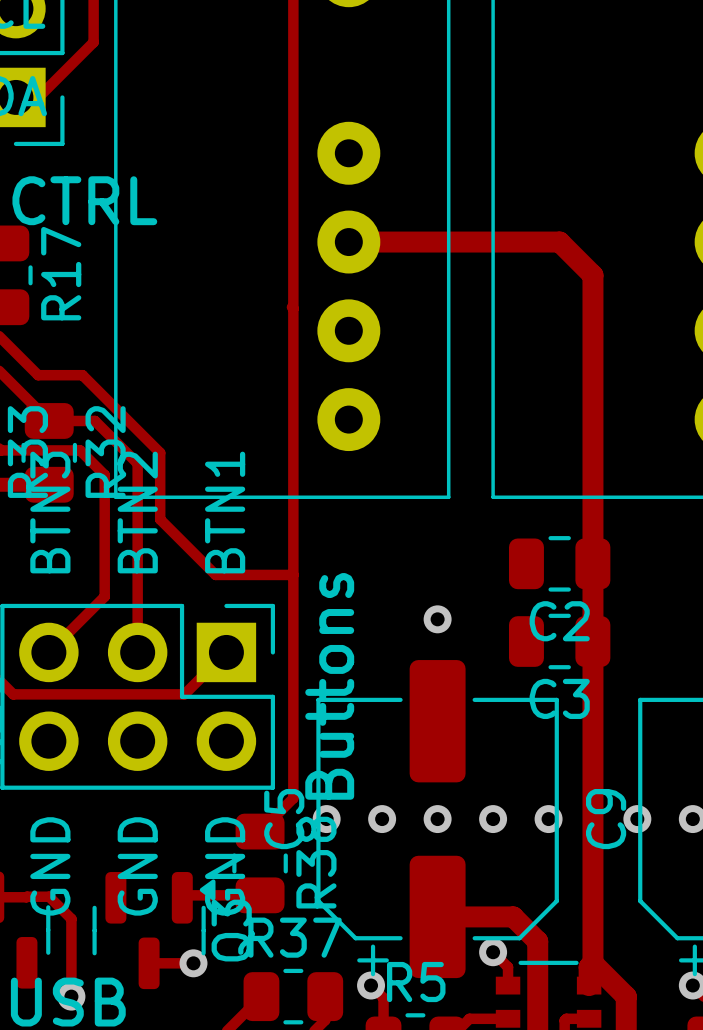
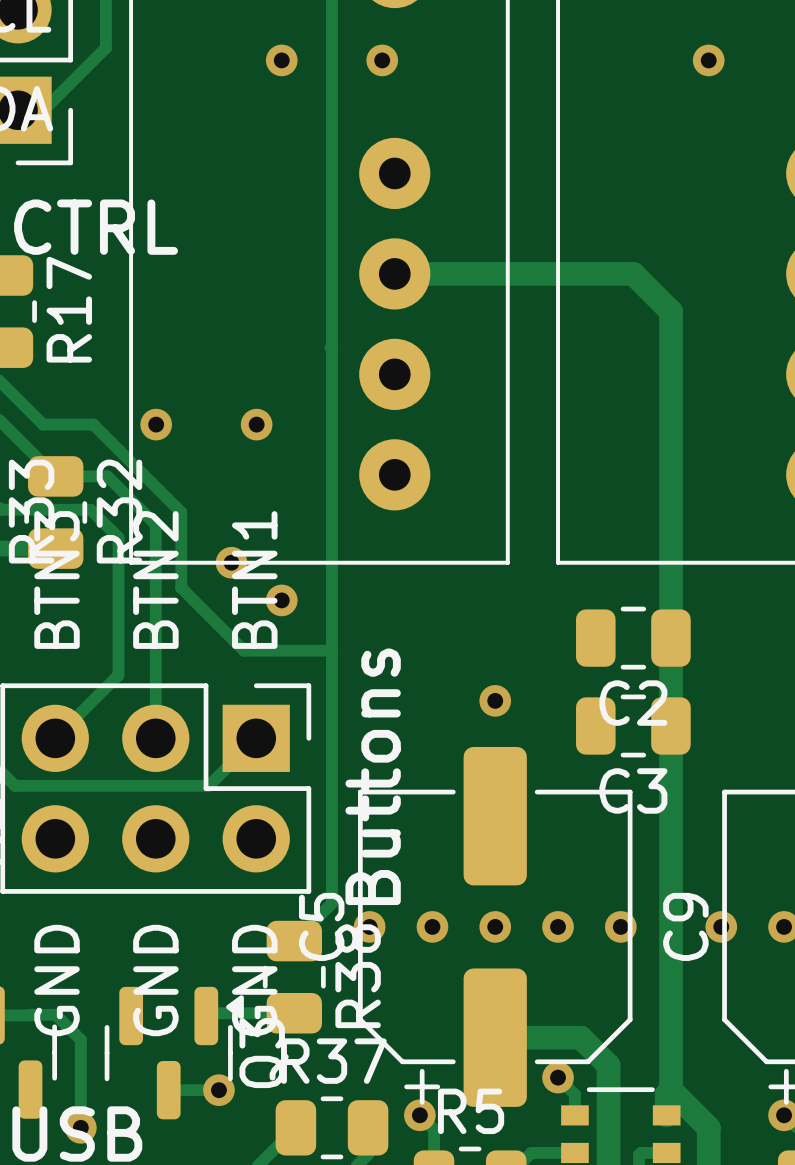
via: none -> (281, 60)
via: none -> (382, 60)
via: none -> (708, 60)
via: none -> (156, 424)
via: none -> (256, 424)
via: none -> (231, 562)
via: none -> (281, 600)

